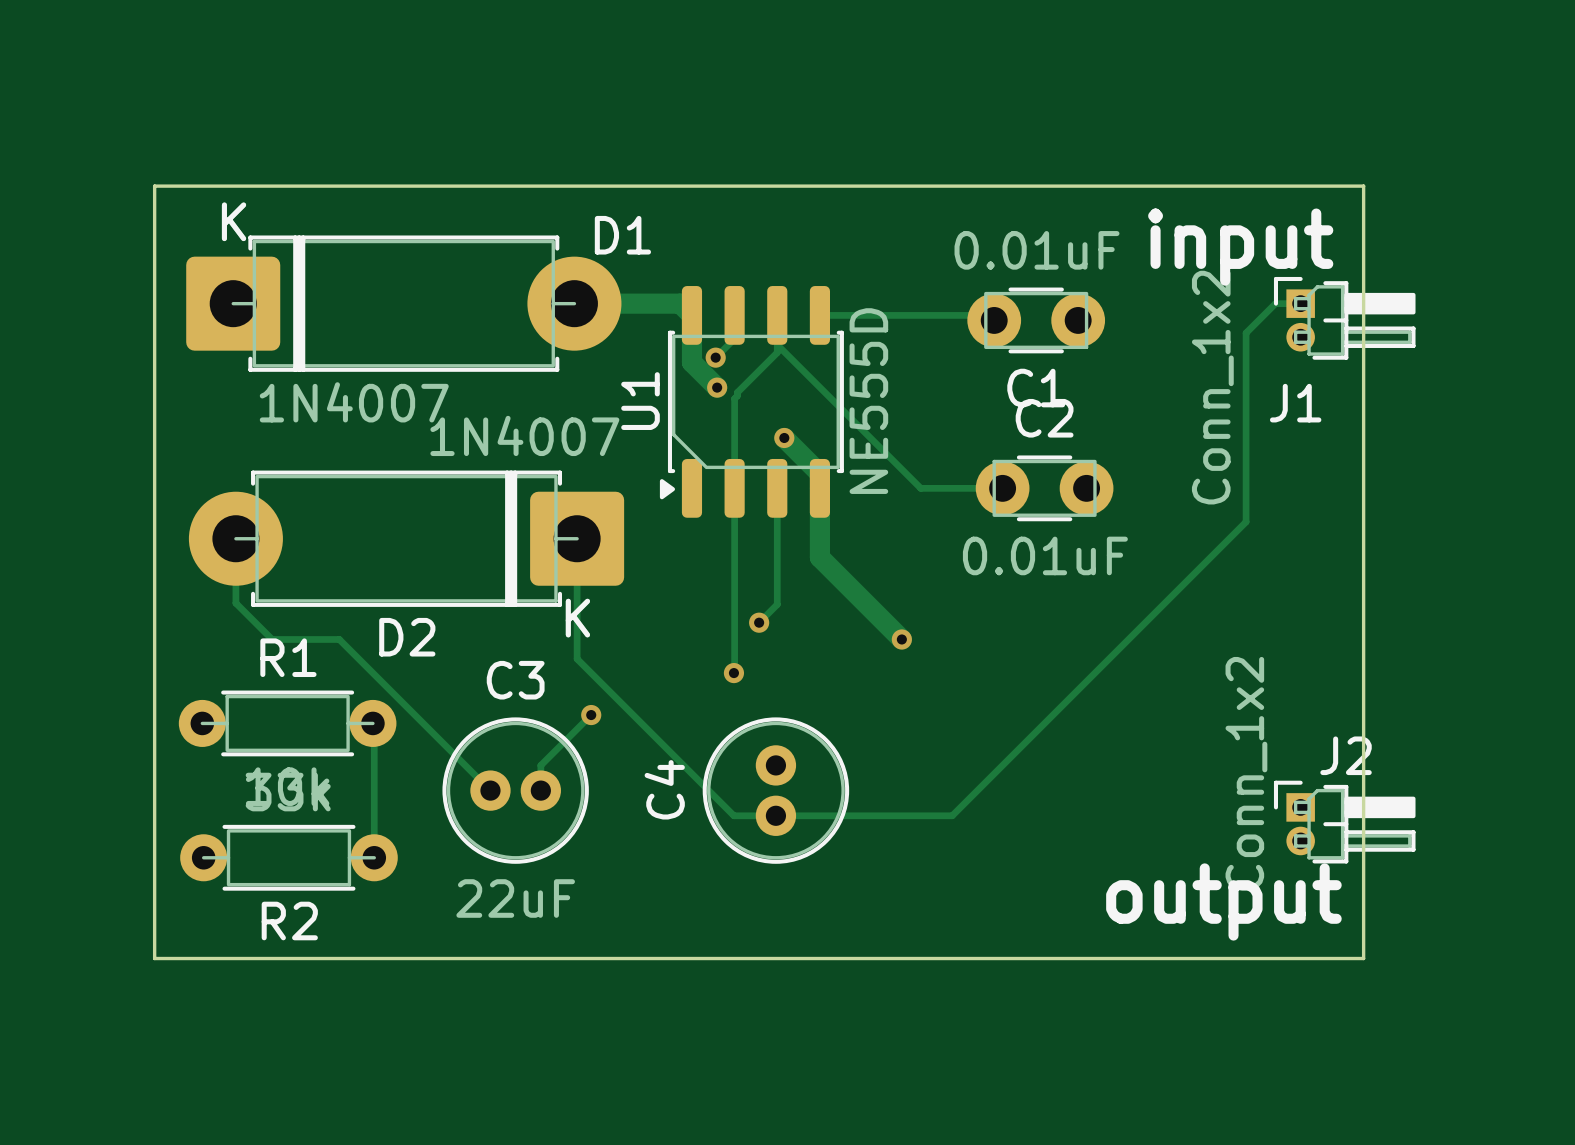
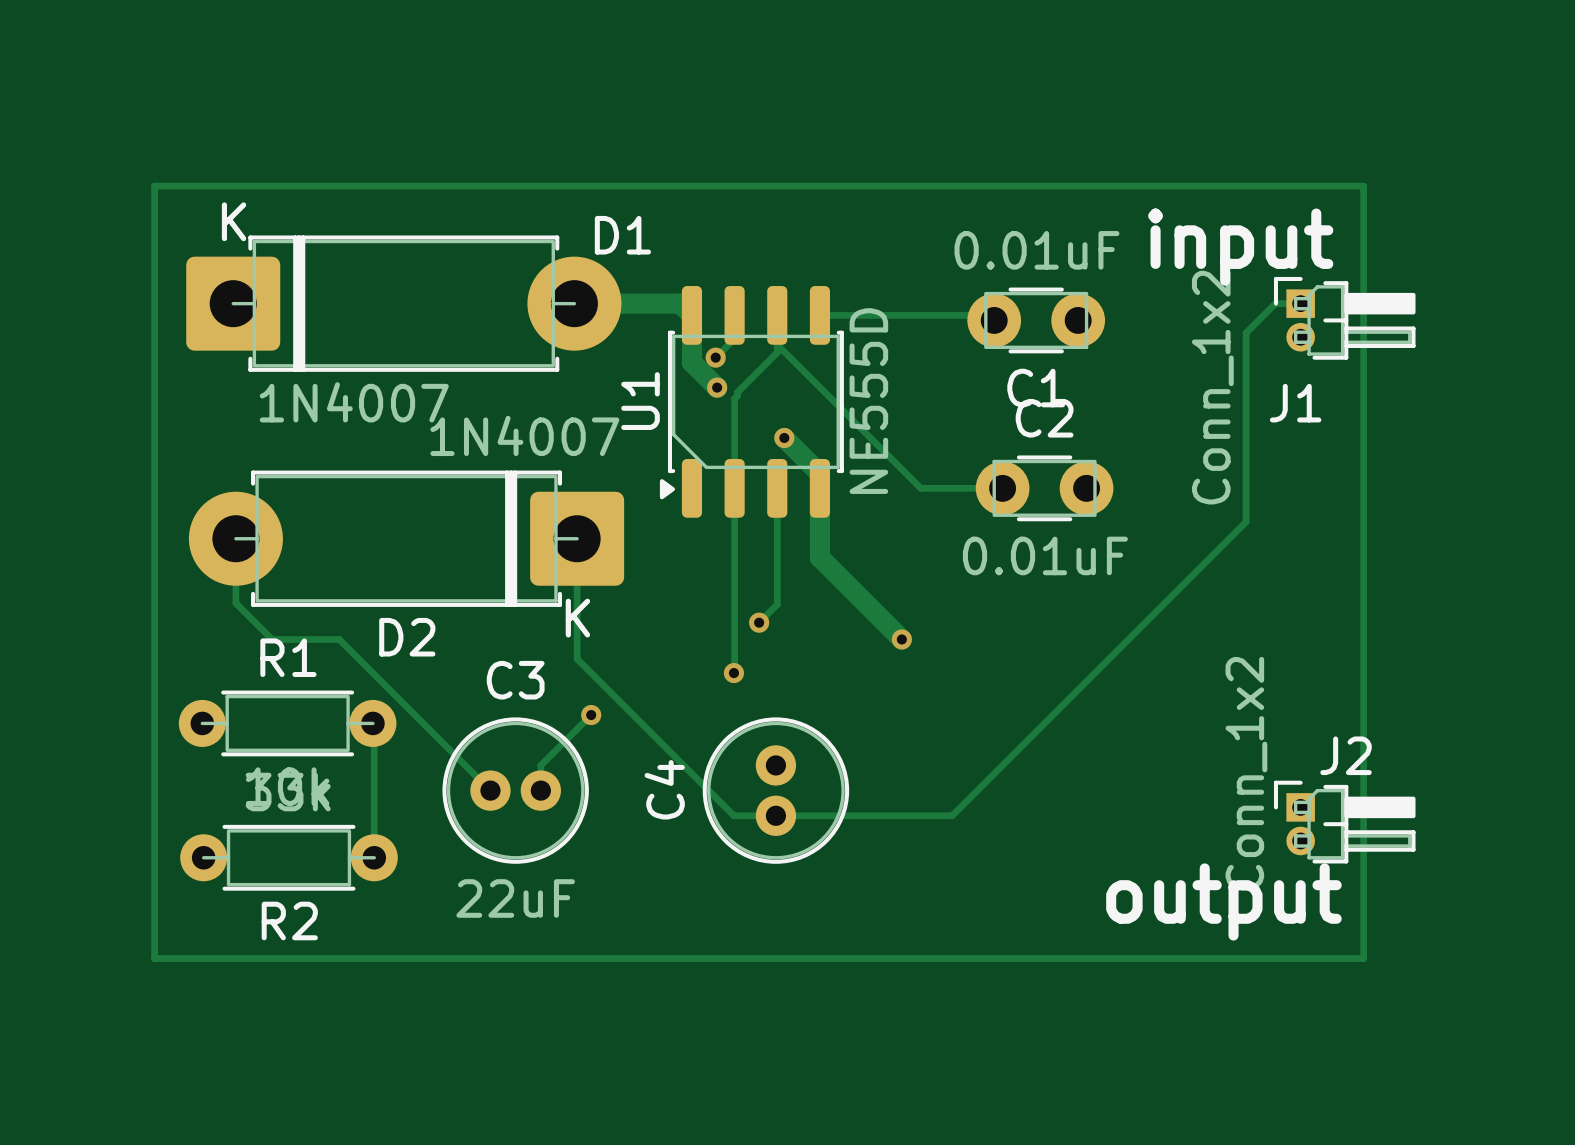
board edge: (154, 186) (1363, 186) (1363, 958) (154, 958) (154, 186) -> none
track: none -> (154, 186) (1363, 186) (1363, 958) (154, 958) (154, 186)

